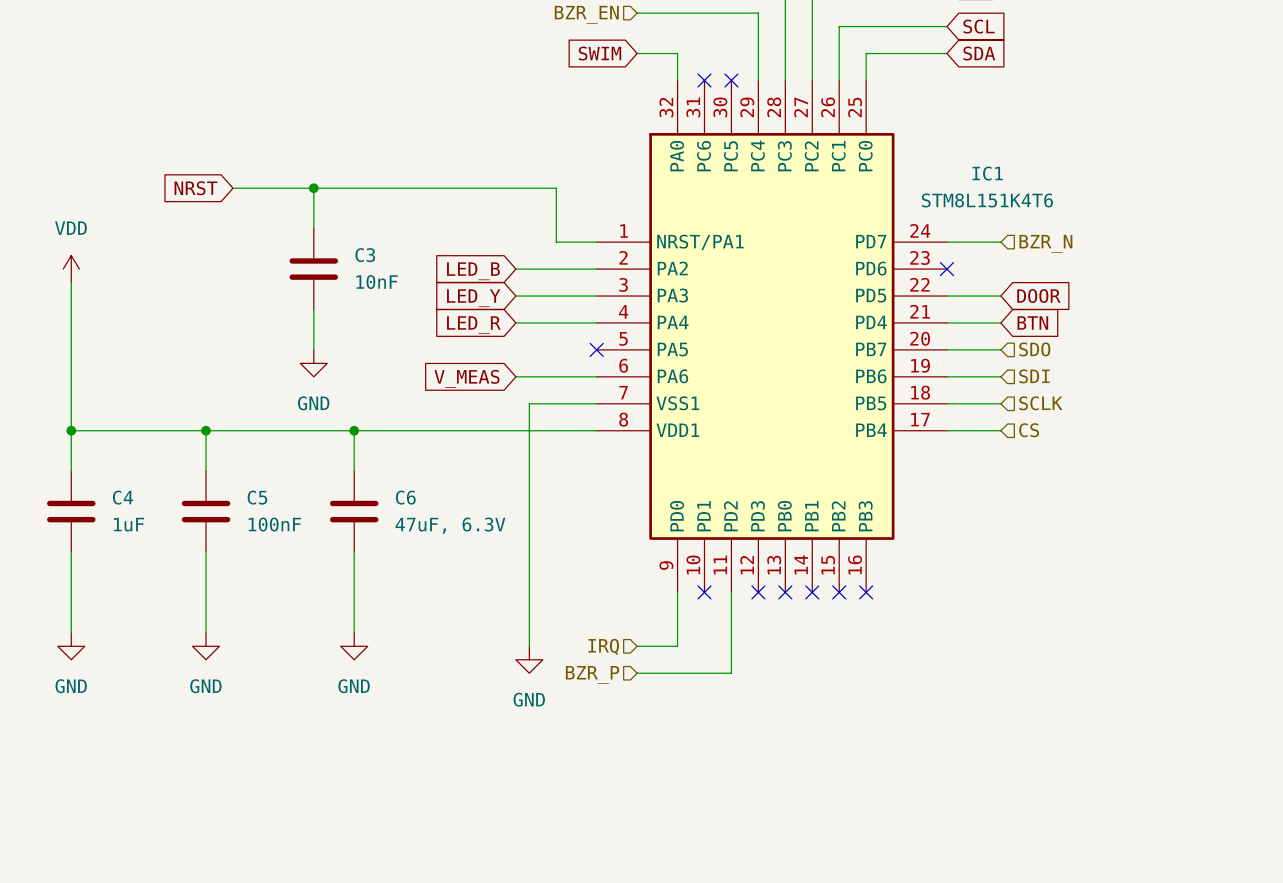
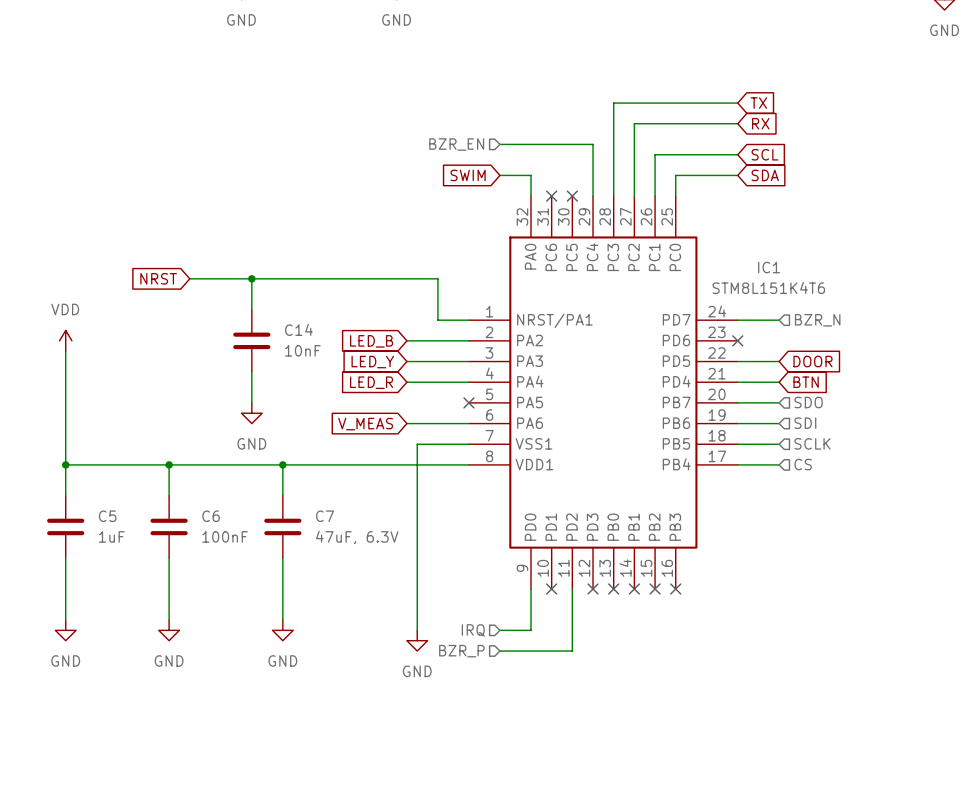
C3 name: C3 (365, 255) -> C14 (298, 329)
C4 name: C4 (123, 497) -> C5 (107, 516)
C5 name: C5 (257, 497) -> C6 (211, 516)
C6 name: C6 (405, 497) -> C7 (325, 516)

